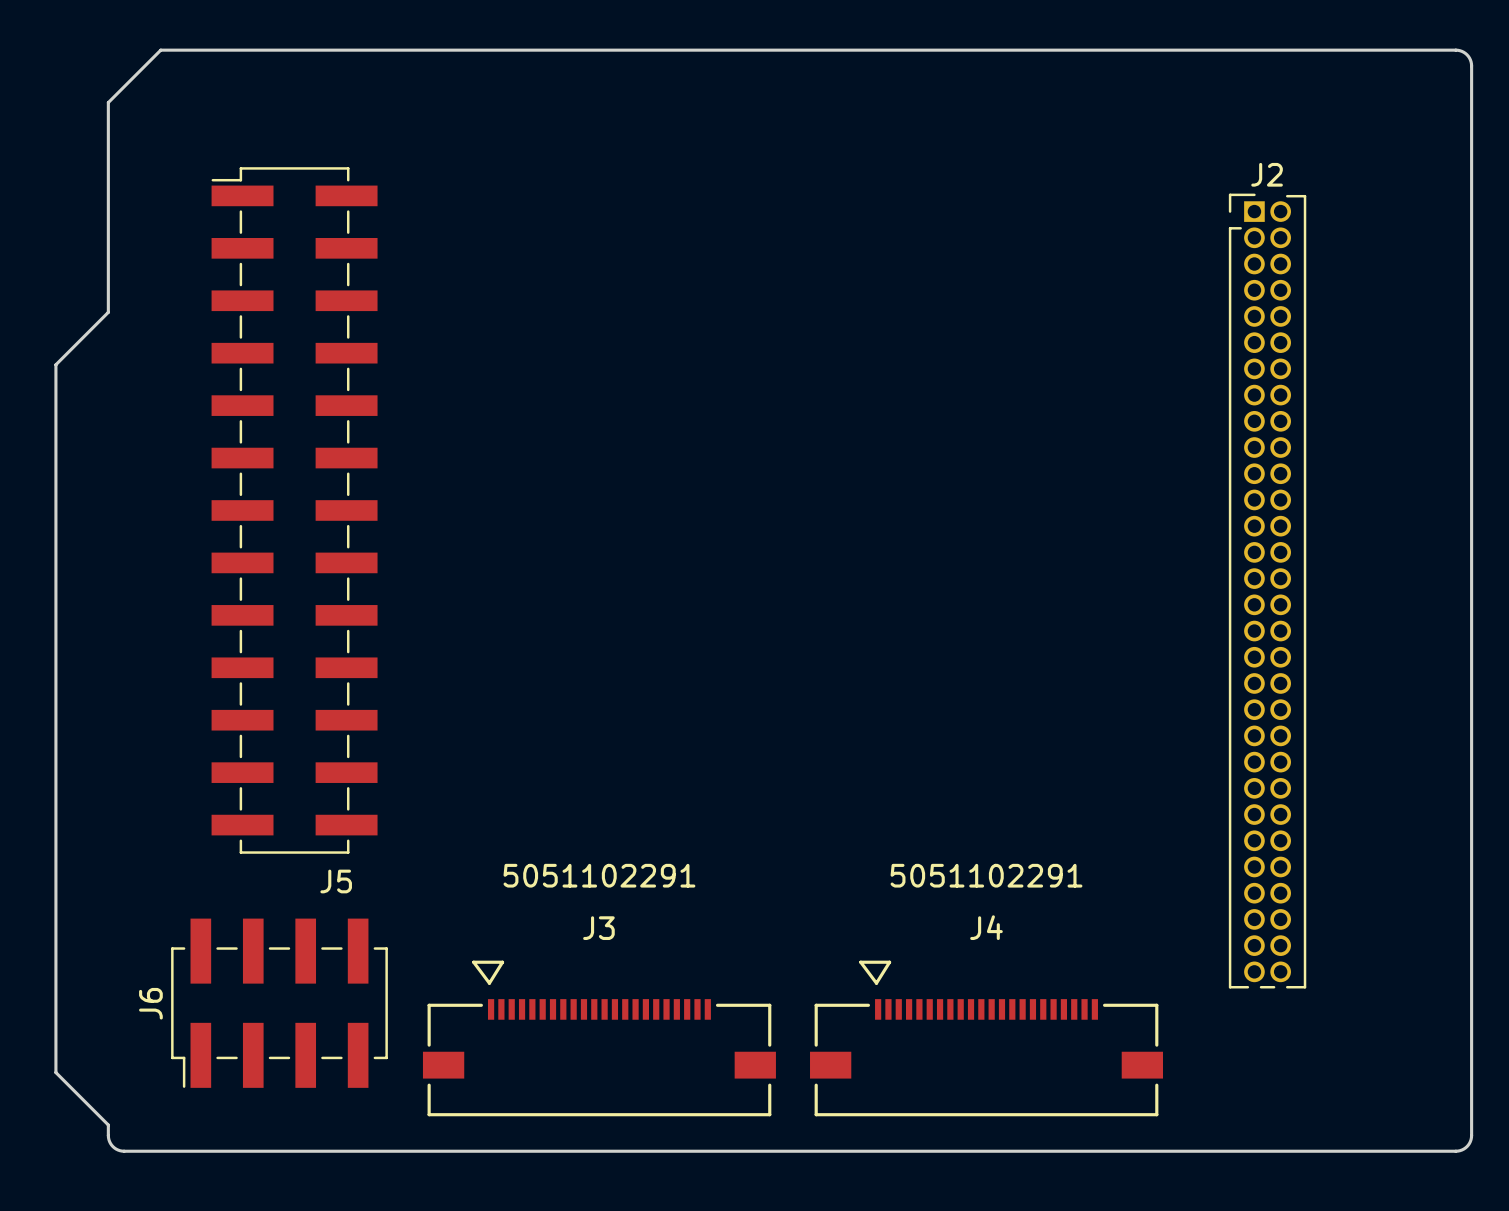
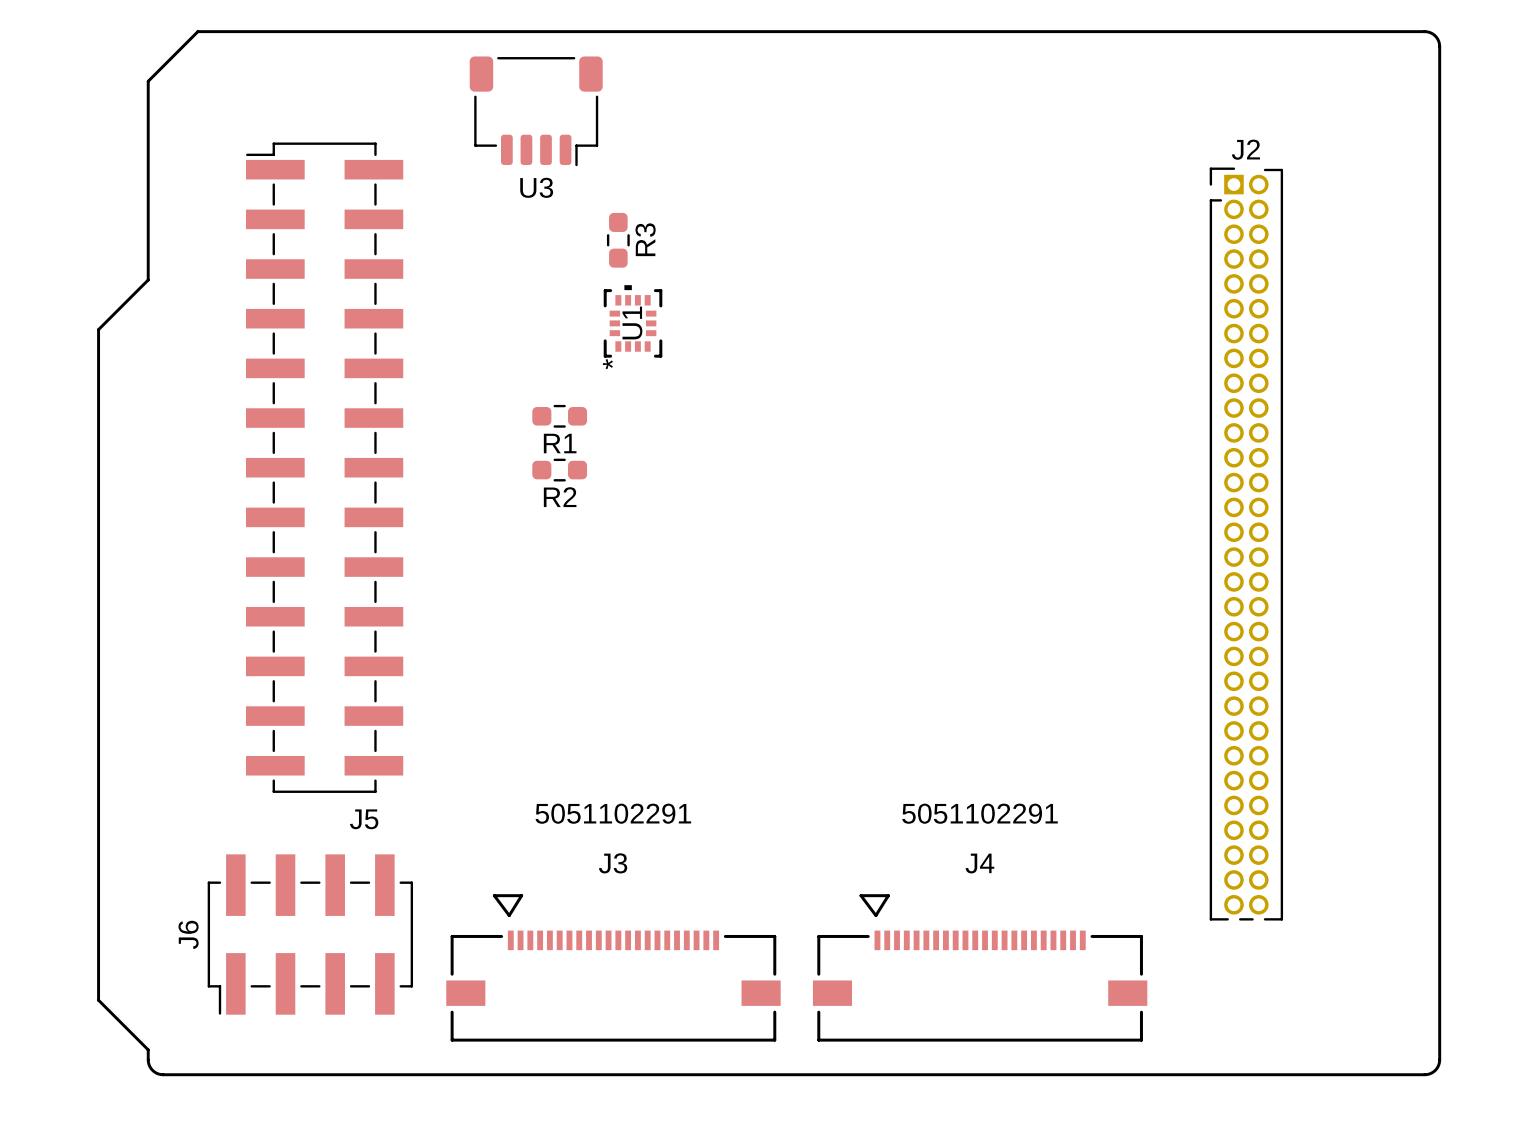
U3: none -> (536, 111)
R3: none -> (618, 240)
U1: none -> (633, 321)
R1: none -> (559, 416)
R2: none -> (559, 470)

